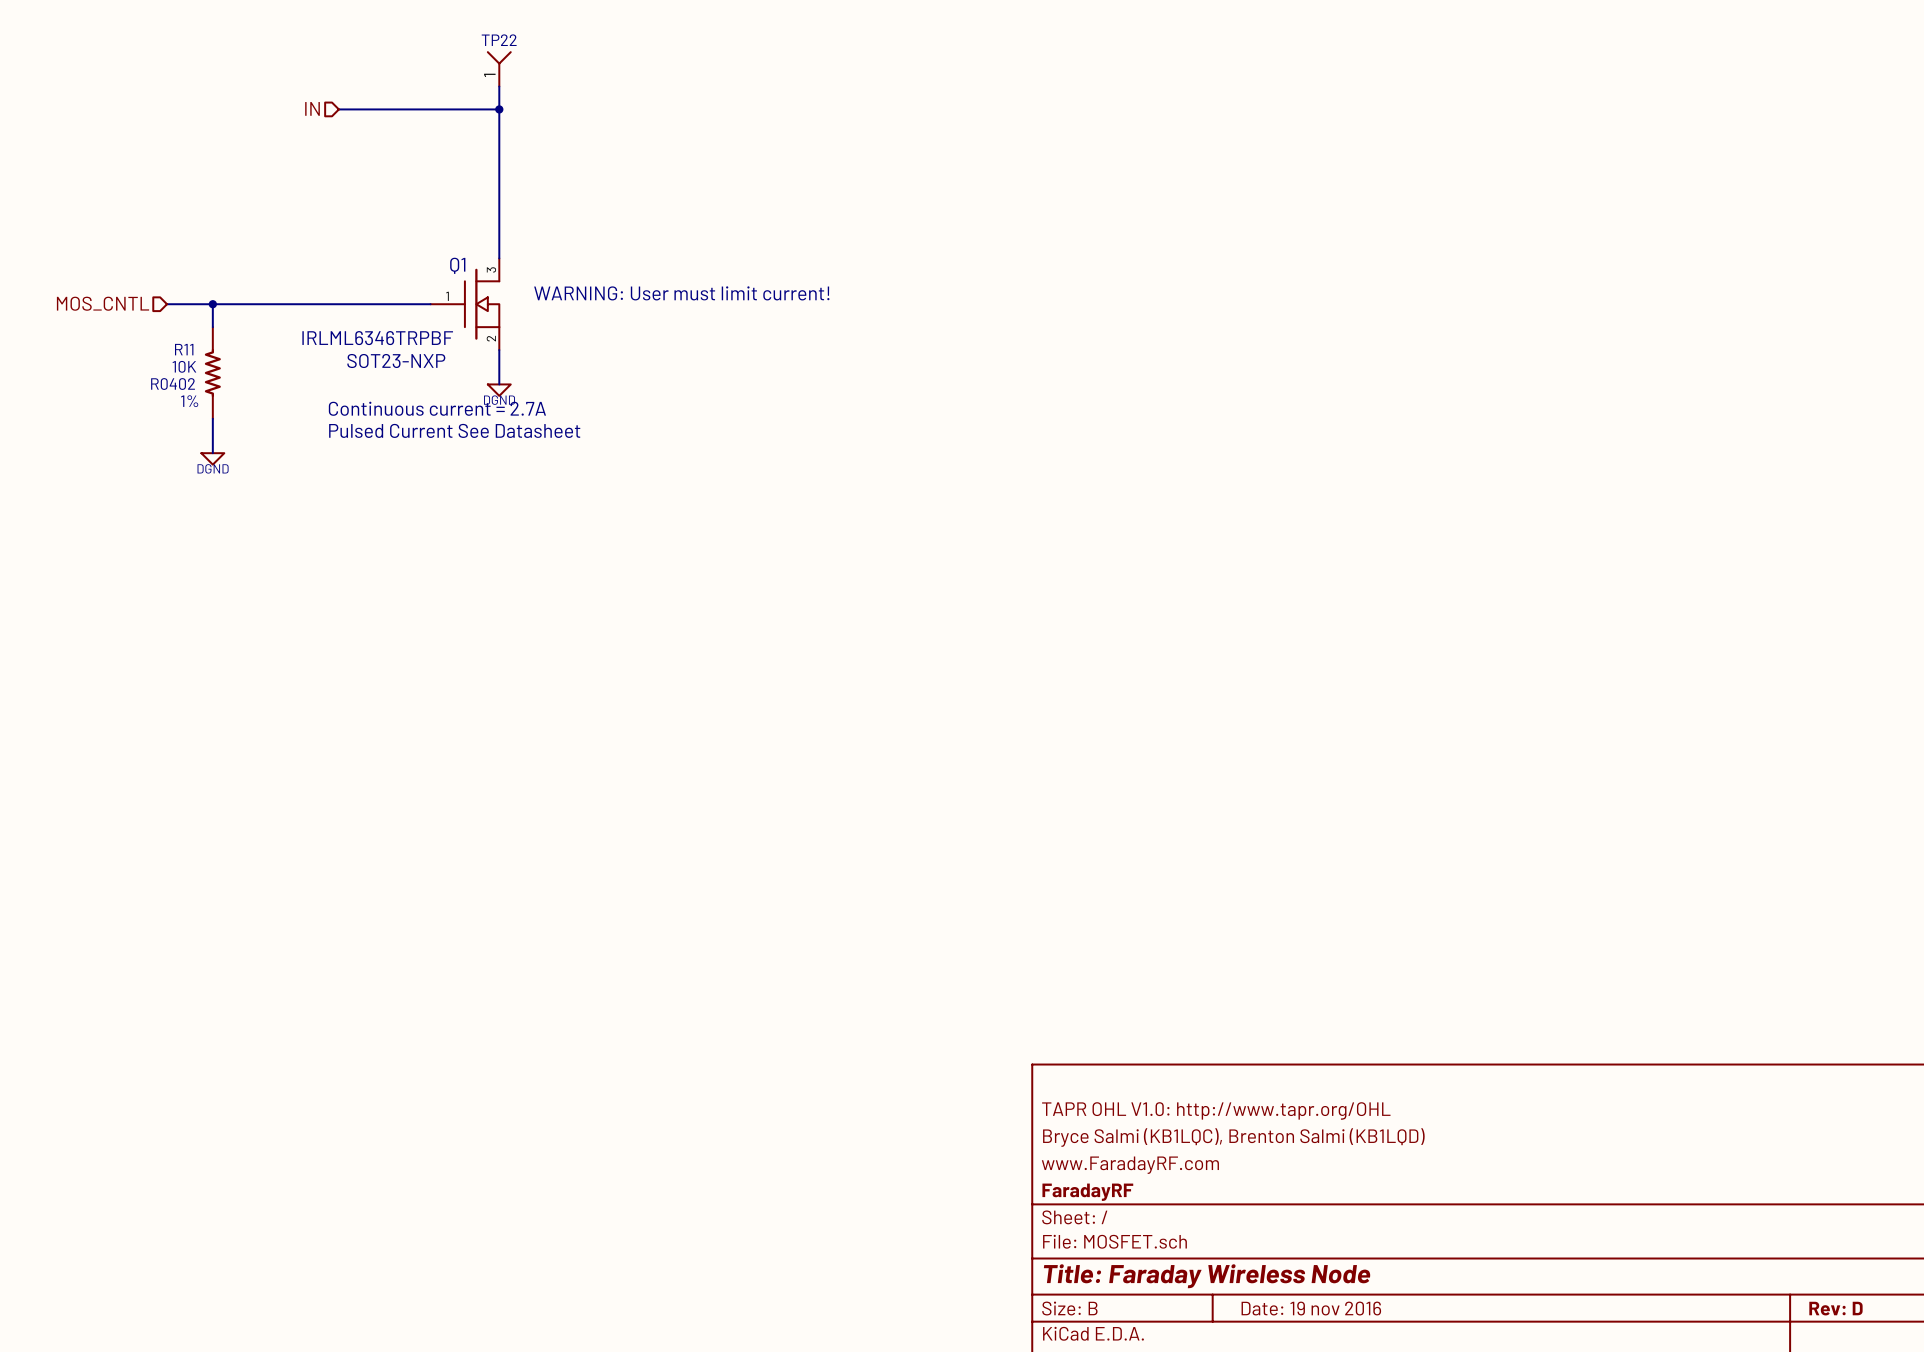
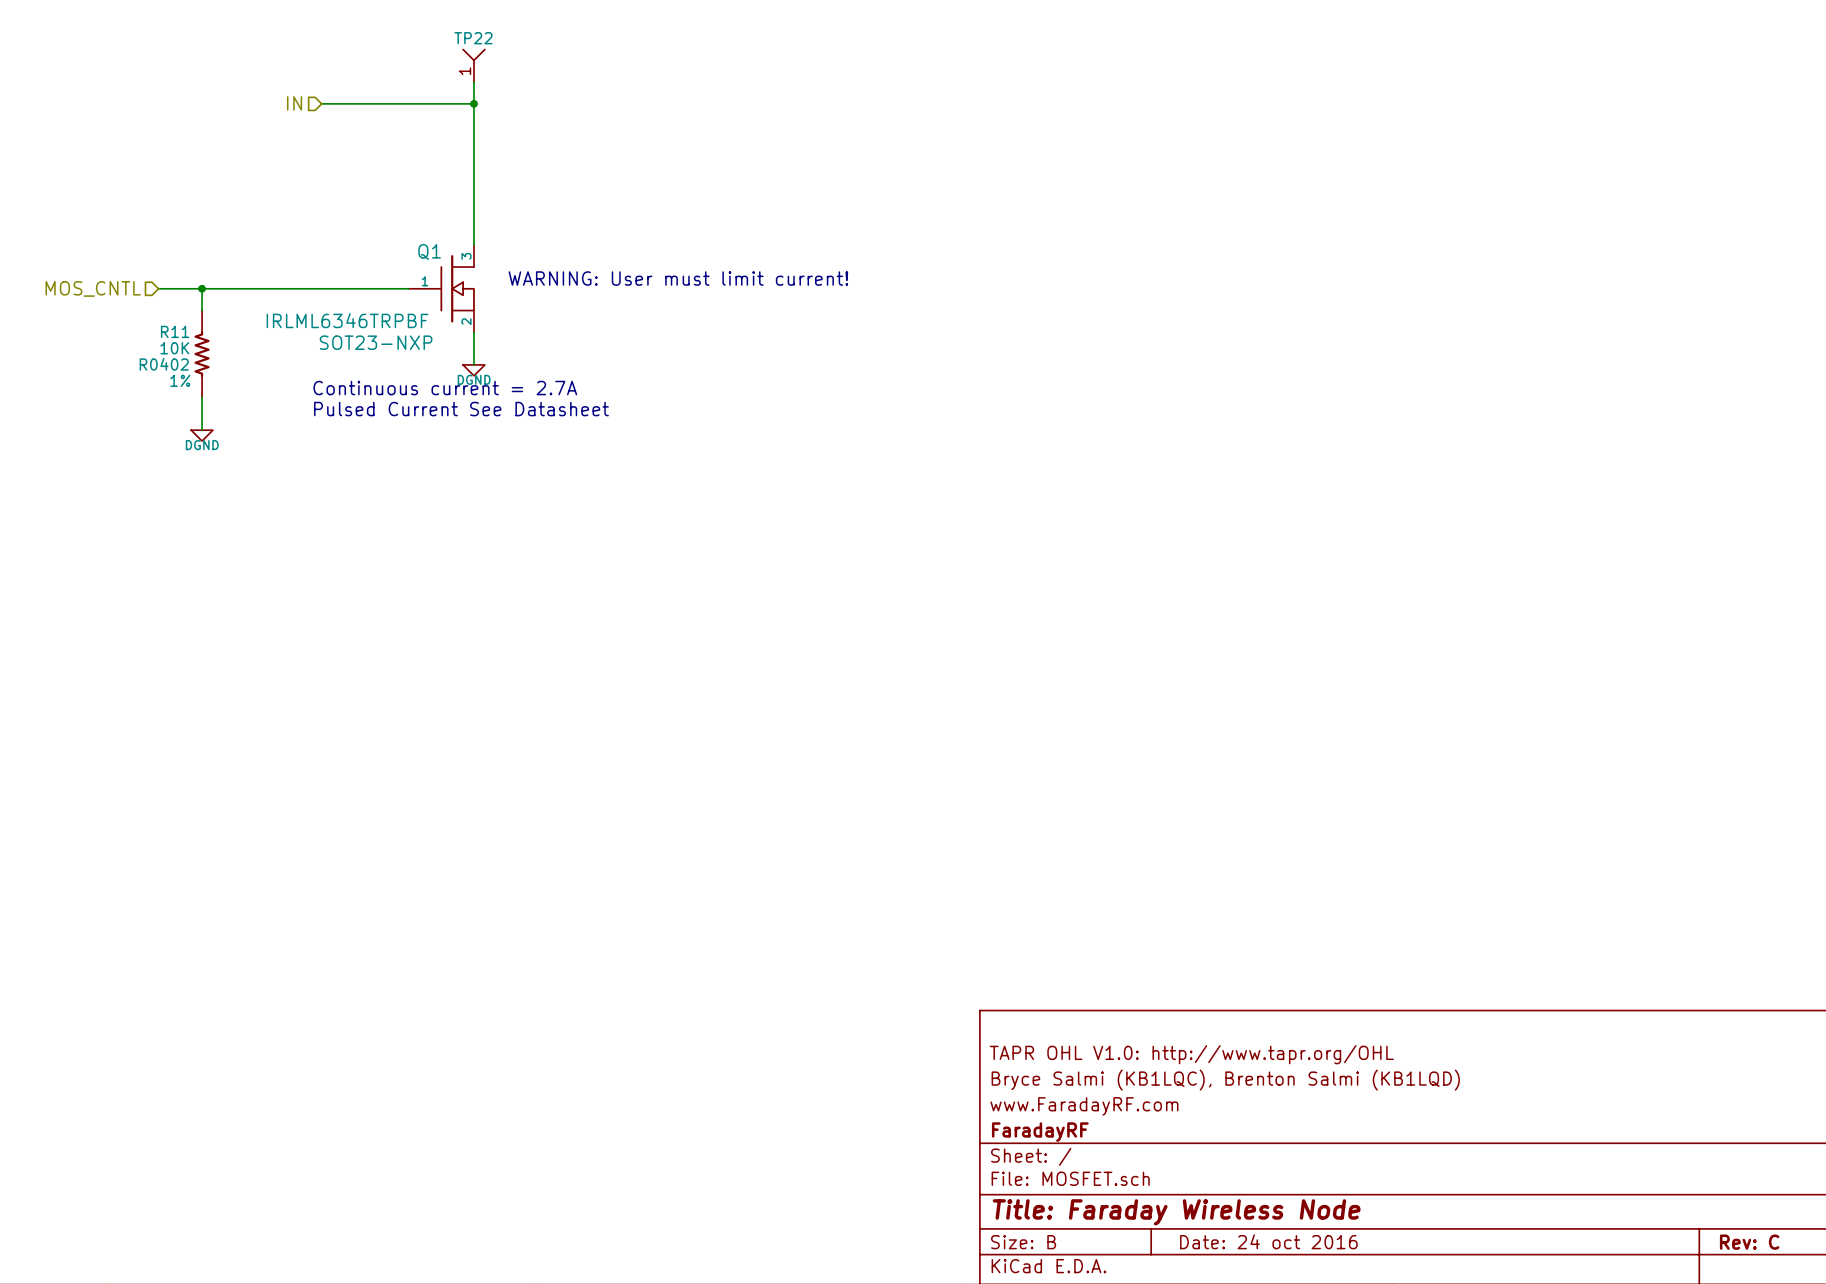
title block: Date: 19 nov 2016 (1311, 1308) -> Date: 24 oct 2016 (1268, 1241)
title block: Rev: D (1835, 1308) -> Rev: C (1749, 1242)

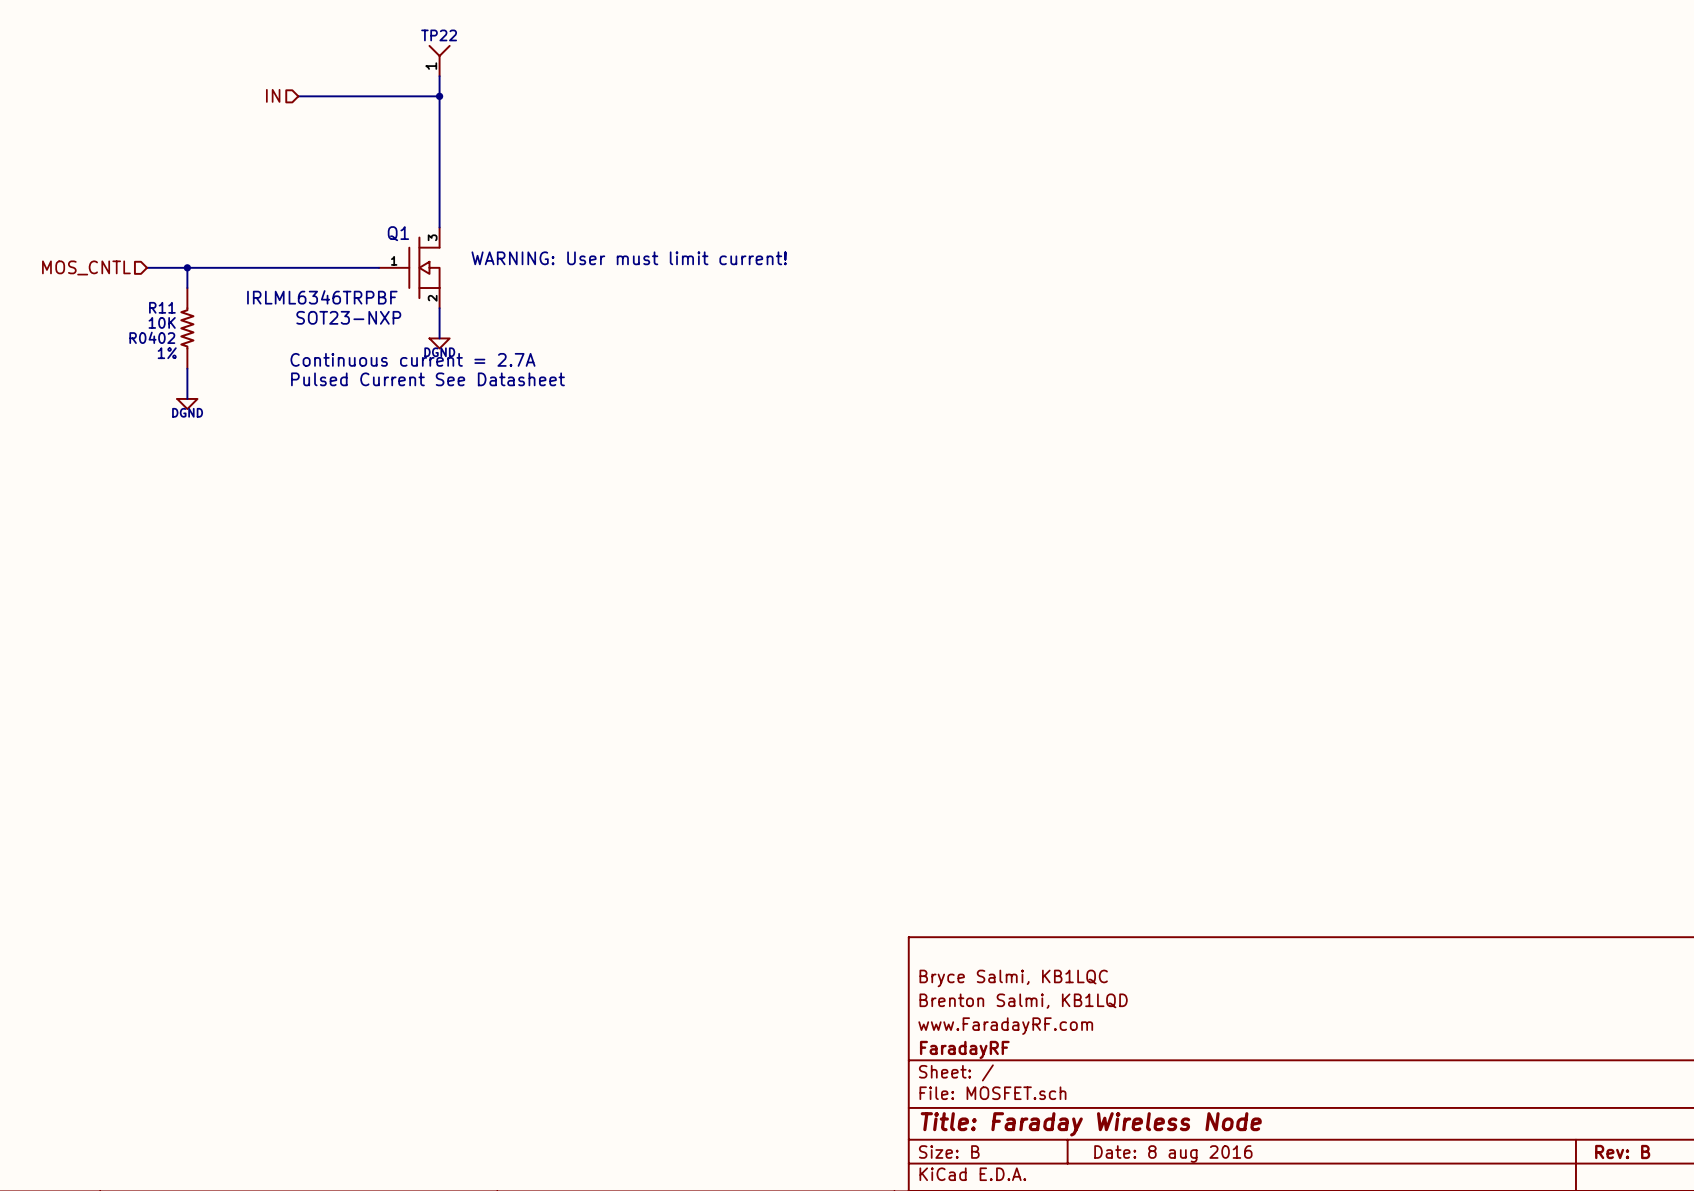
title block: TAPR OHL V1.0: http://www.tapr.org/OHL (1191, 1054) -> Bryce Salmi, KB1LQC (1013, 978)
title block: Bryce Salmi (KB1LQC), Brenton Salmi (KB1LQD) (1225, 1080) -> Brenton Salmi, KB1LQD (1023, 1001)
title block: Date: 24 oct 2016 (1268, 1241) -> Date: 8 aug 2016 (1173, 1153)
title block: Rev: C (1749, 1242) -> Rev: B (1622, 1152)

